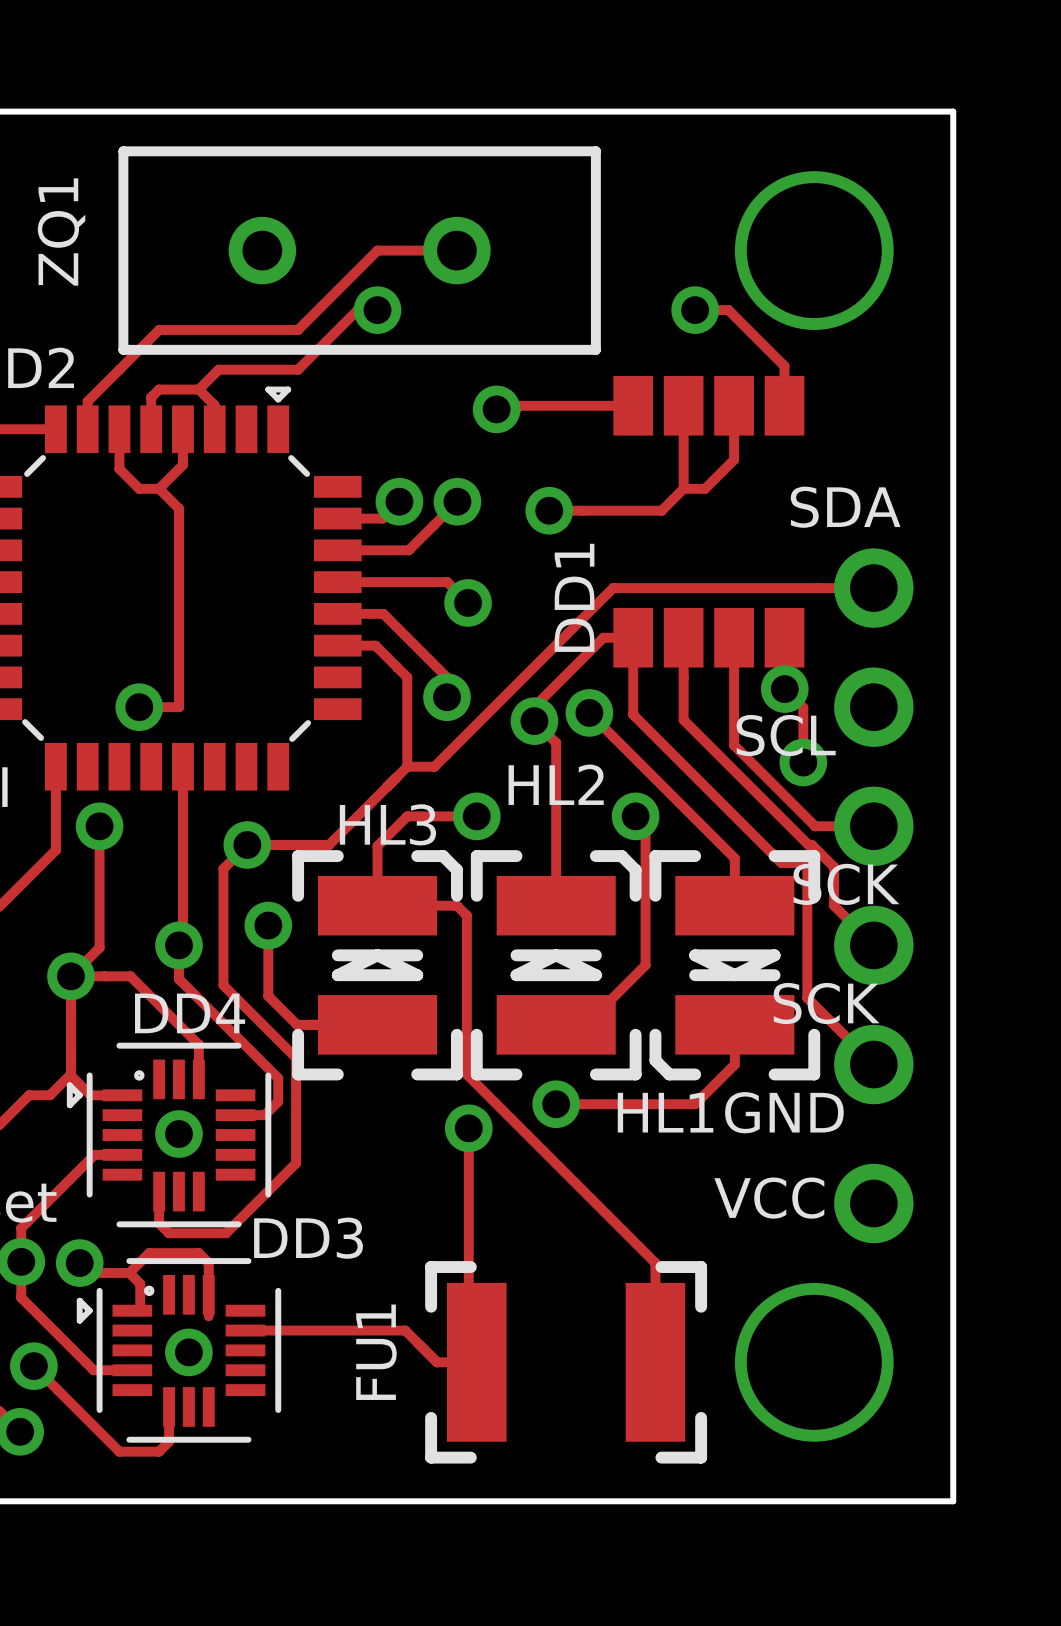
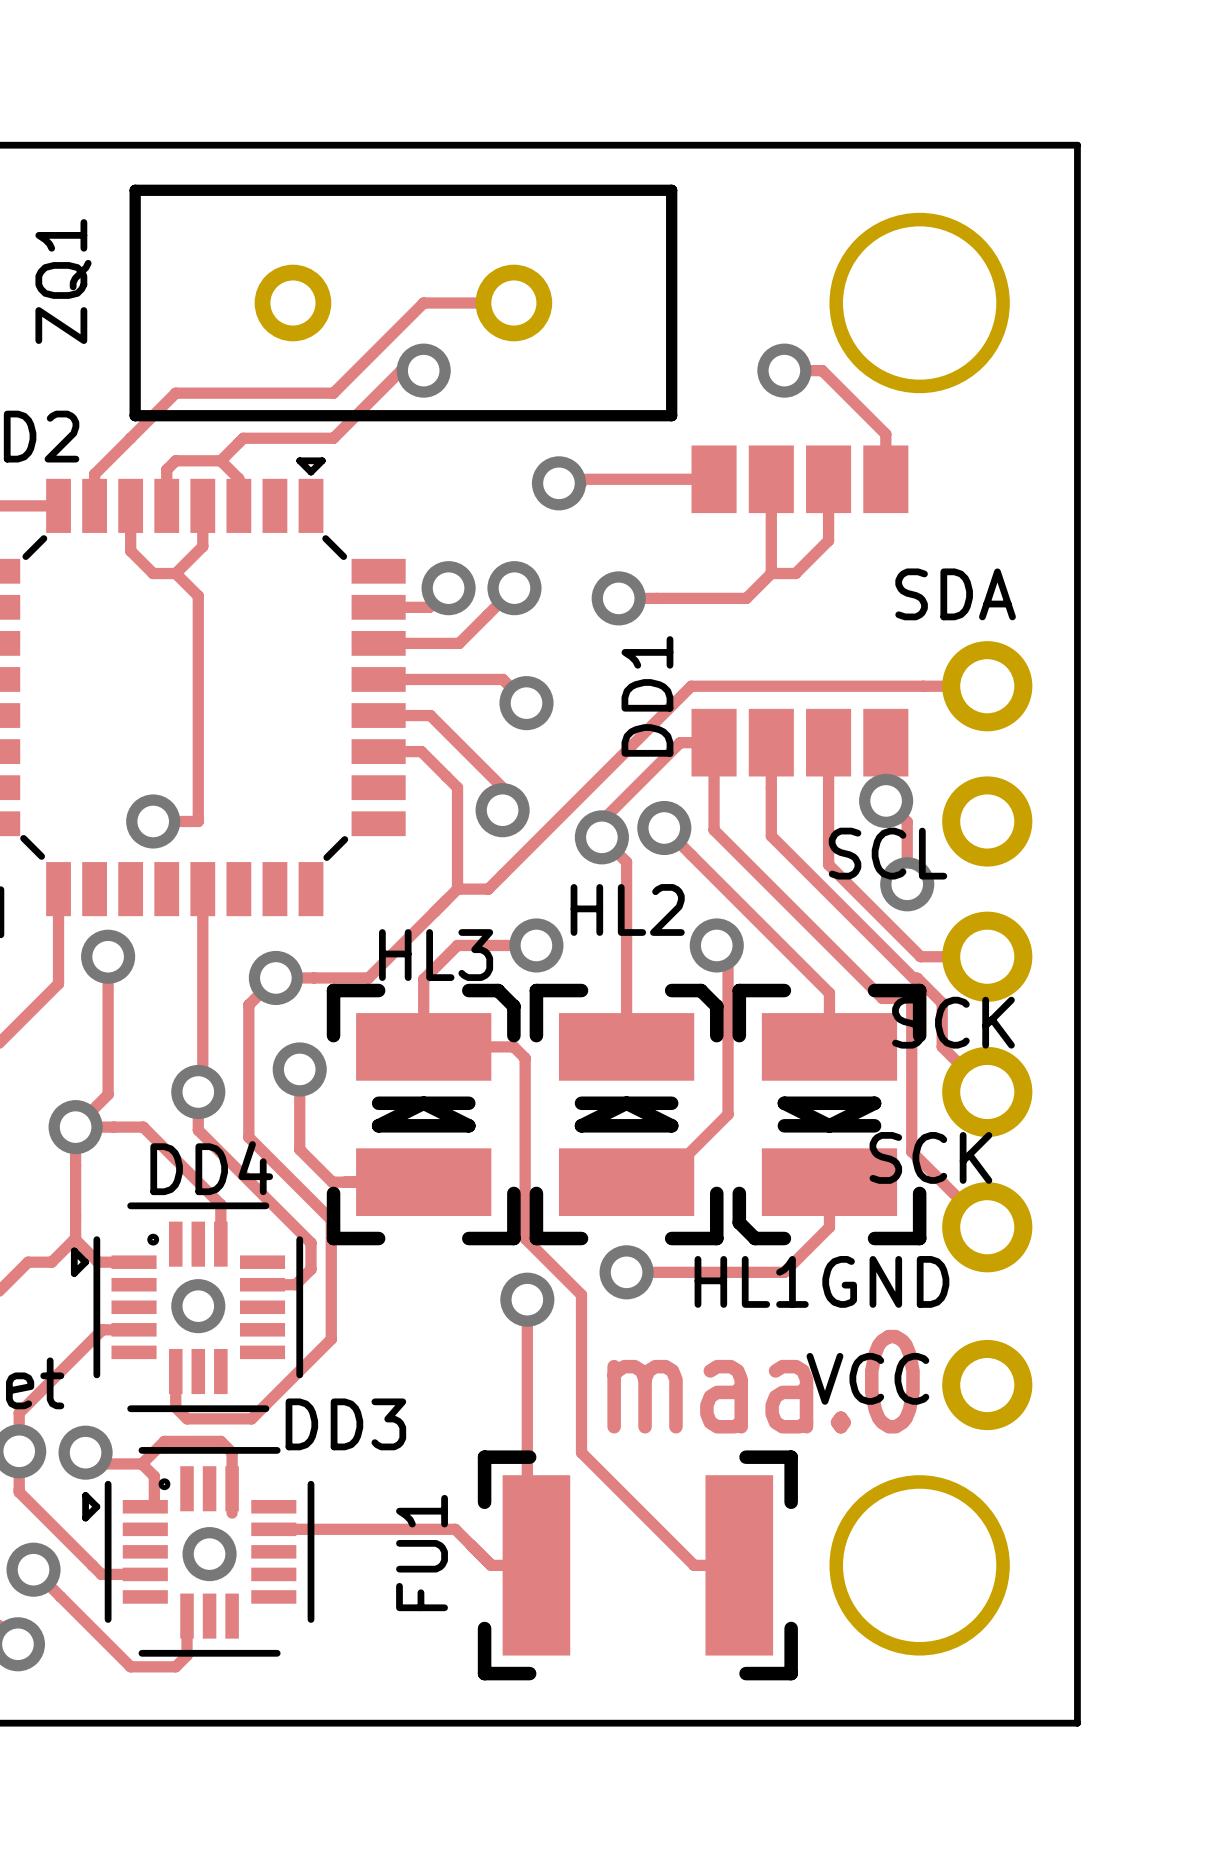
track: (516, 1124) (655, 1263) (655, 1312) -> (581, 1294) (581, 1452) (694, 1565) (739, 1565)
text: none -> maa.0 (763, 1381)

